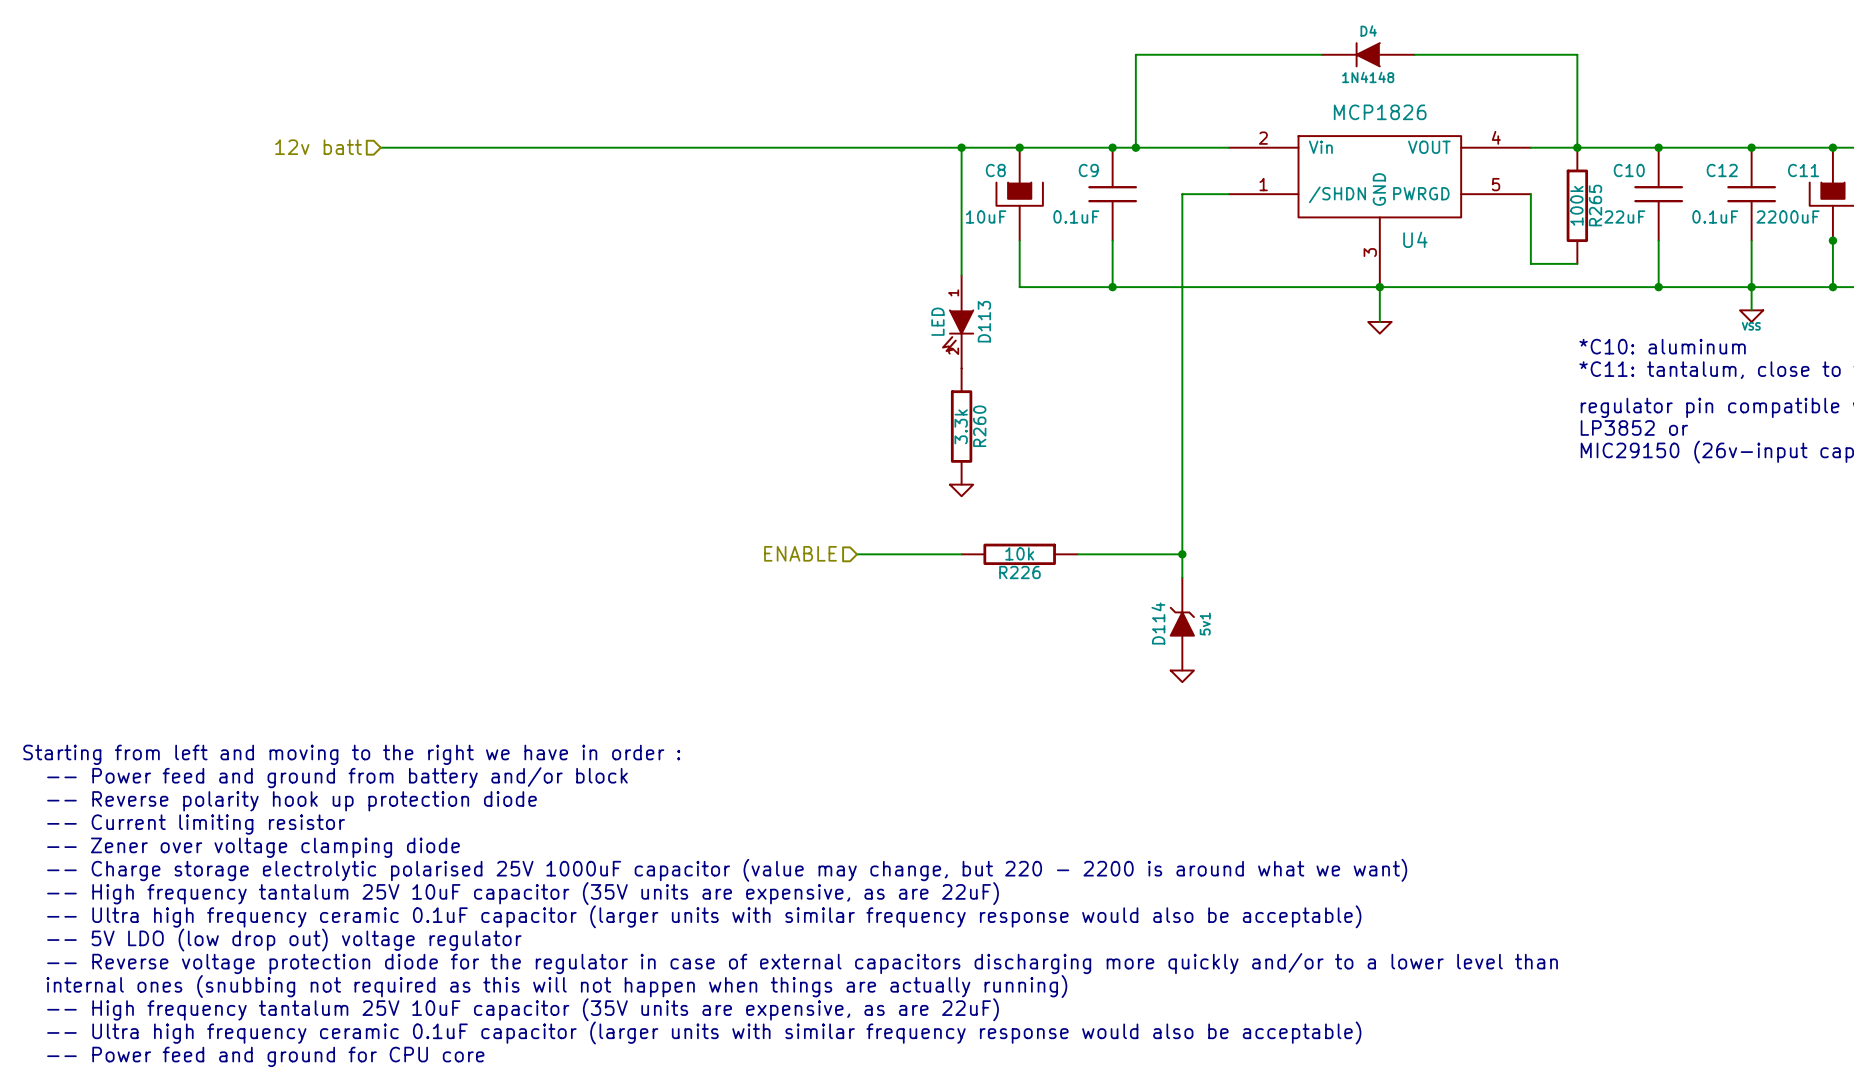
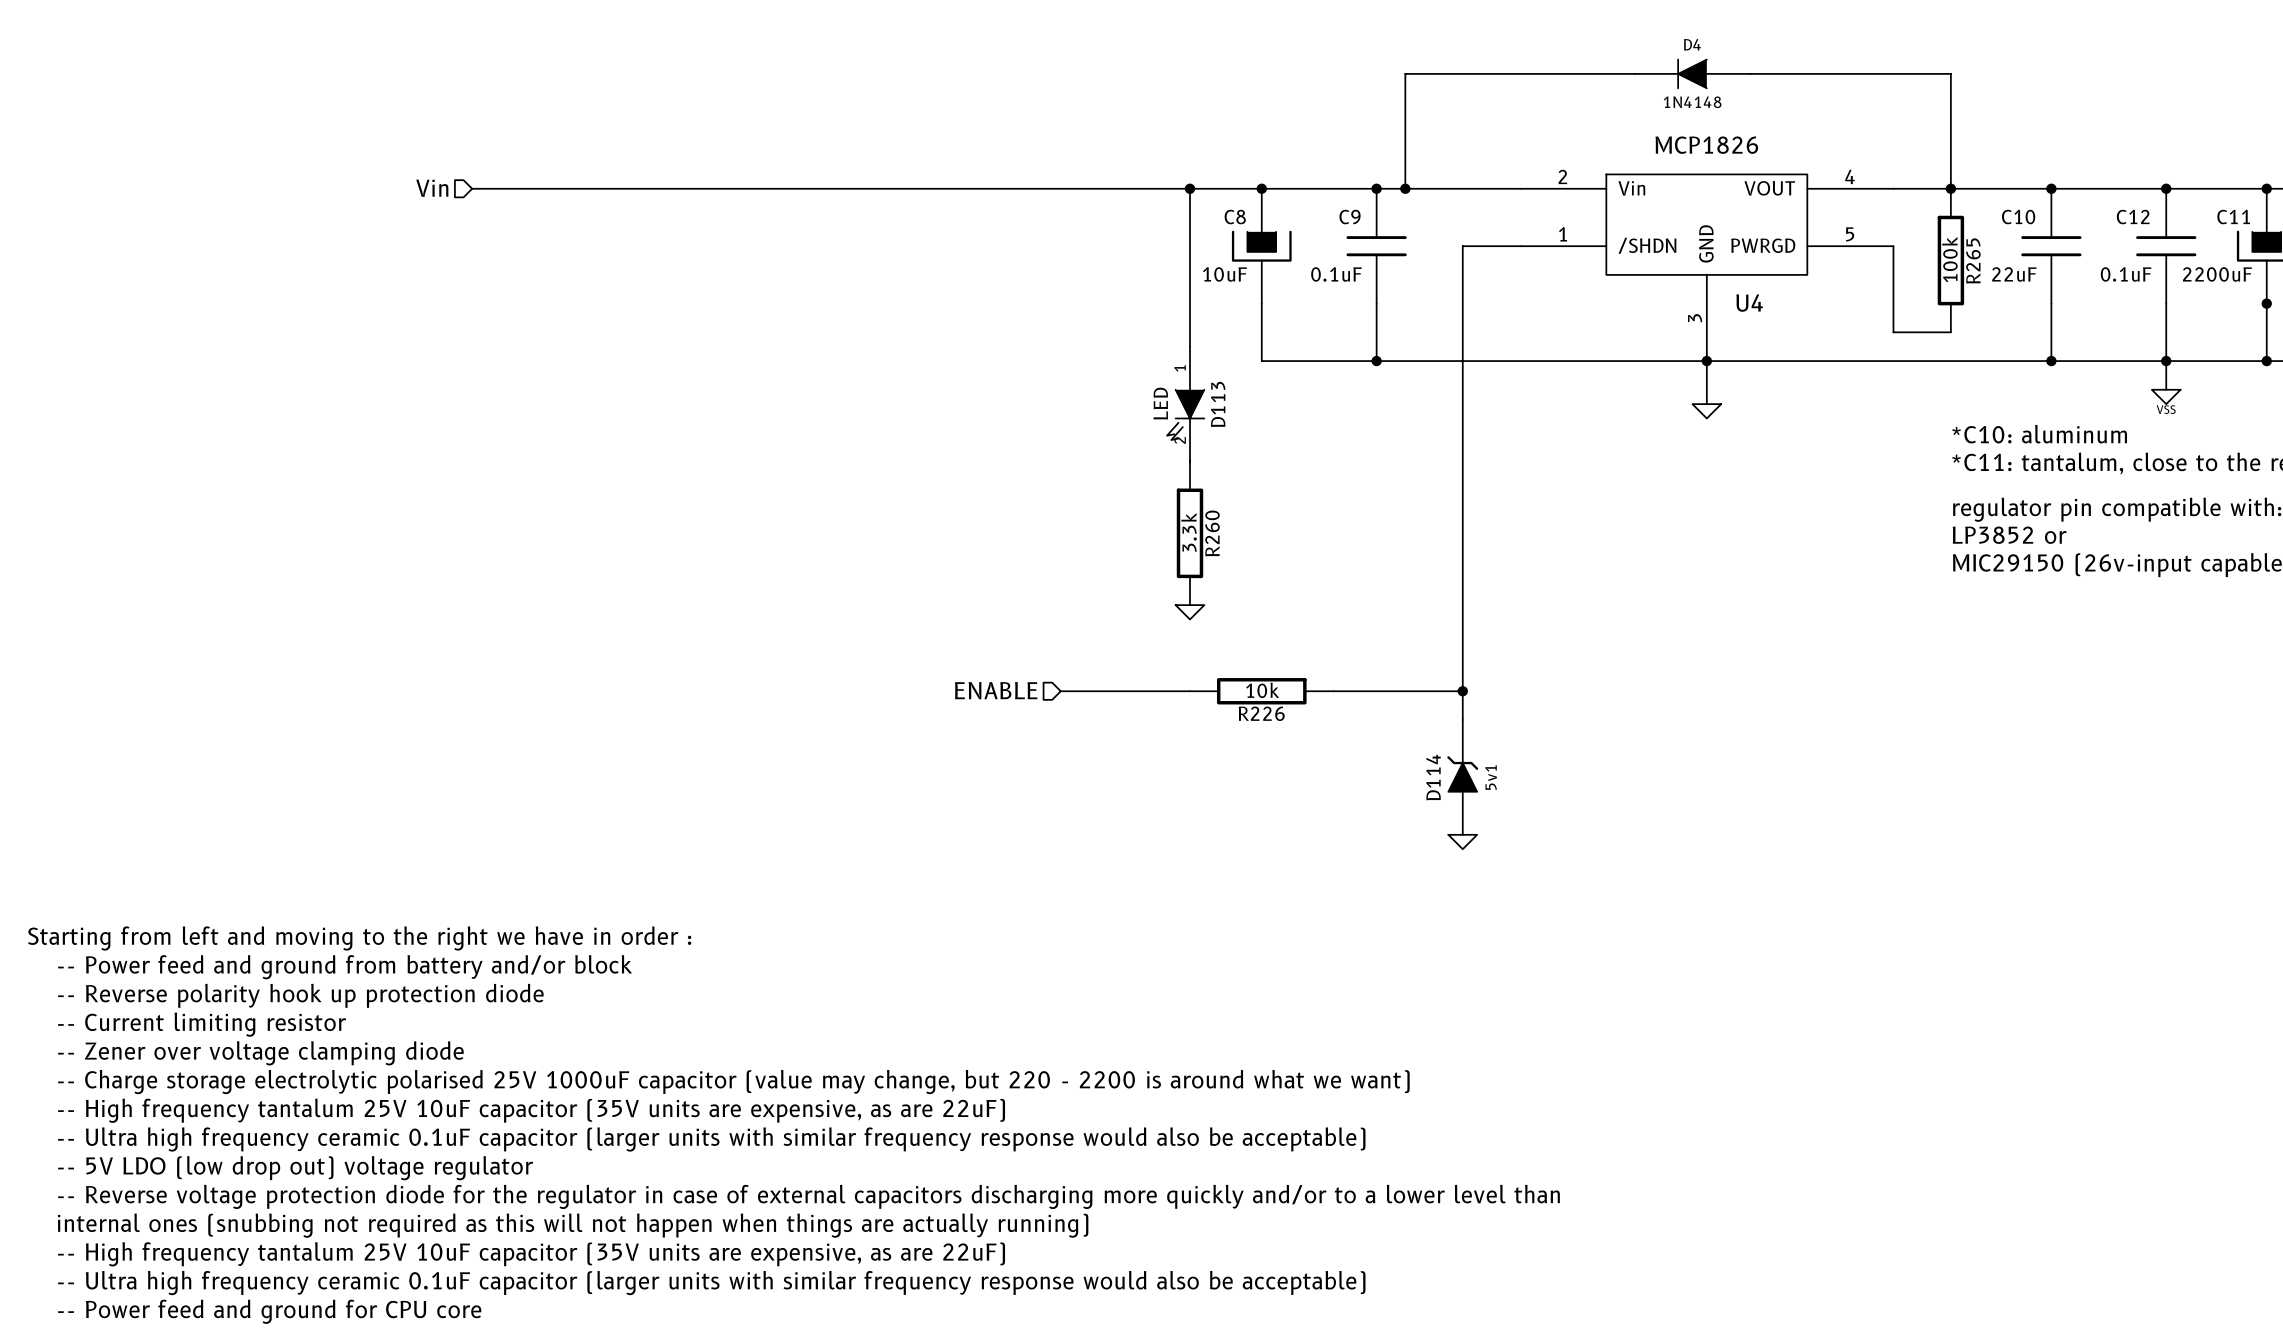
hierarchical label: 12v batt (318, 147) -> Vin (432, 188)

